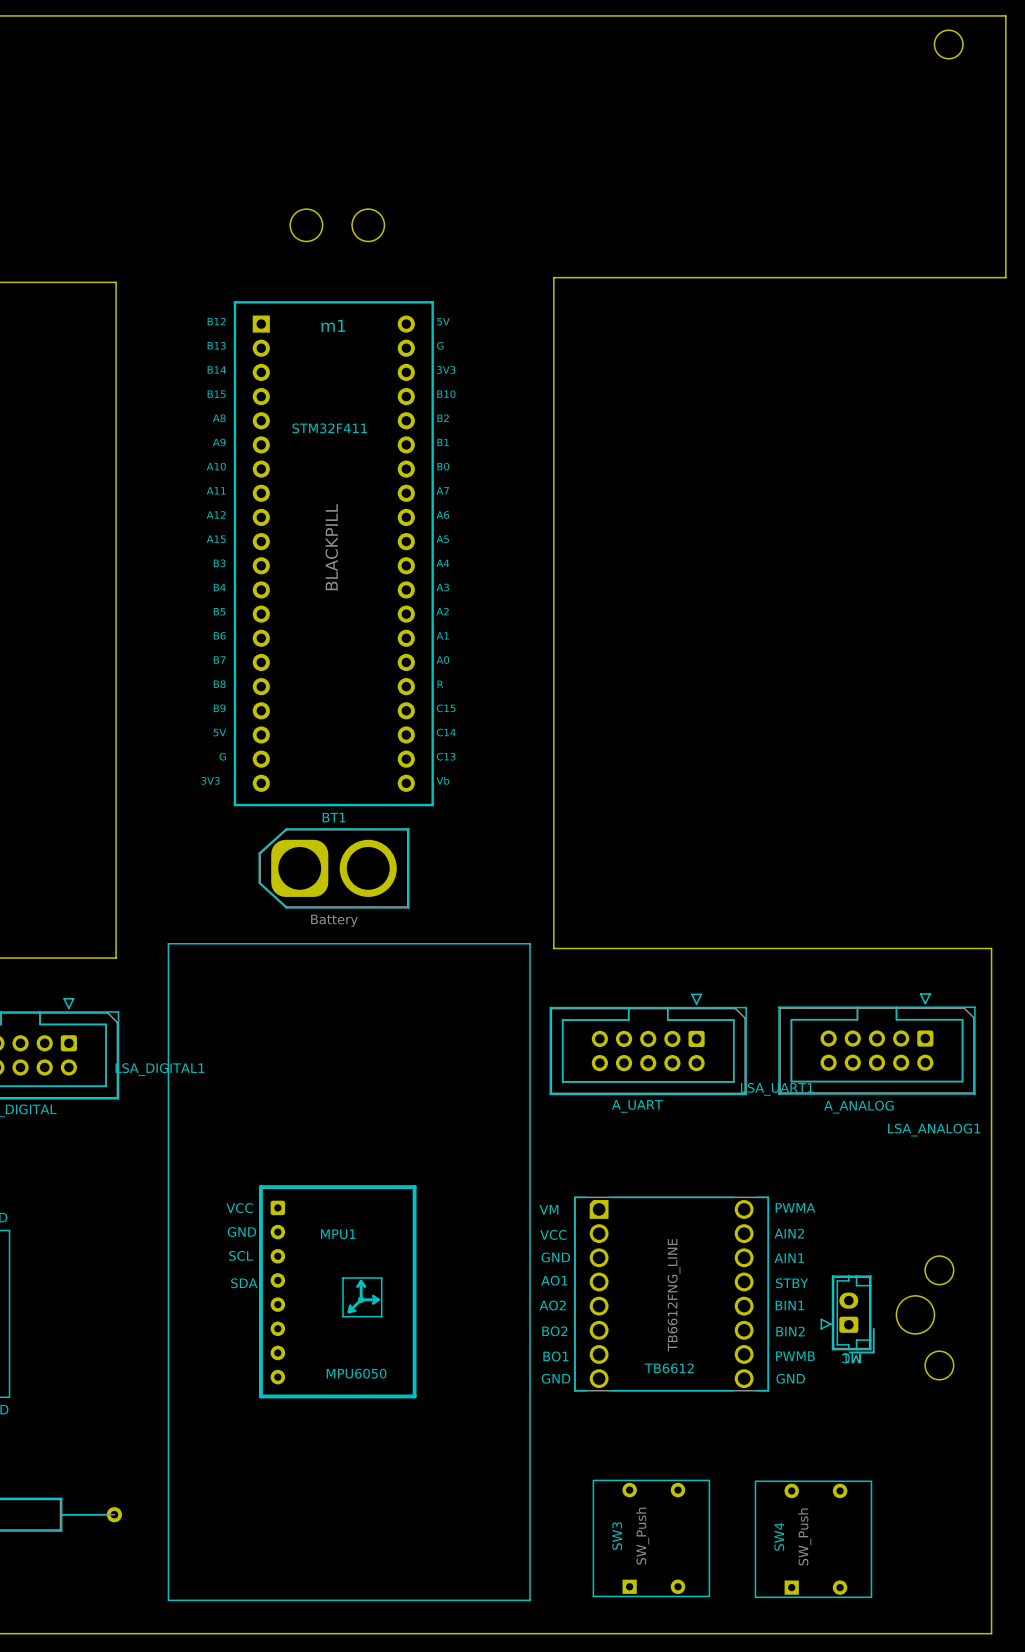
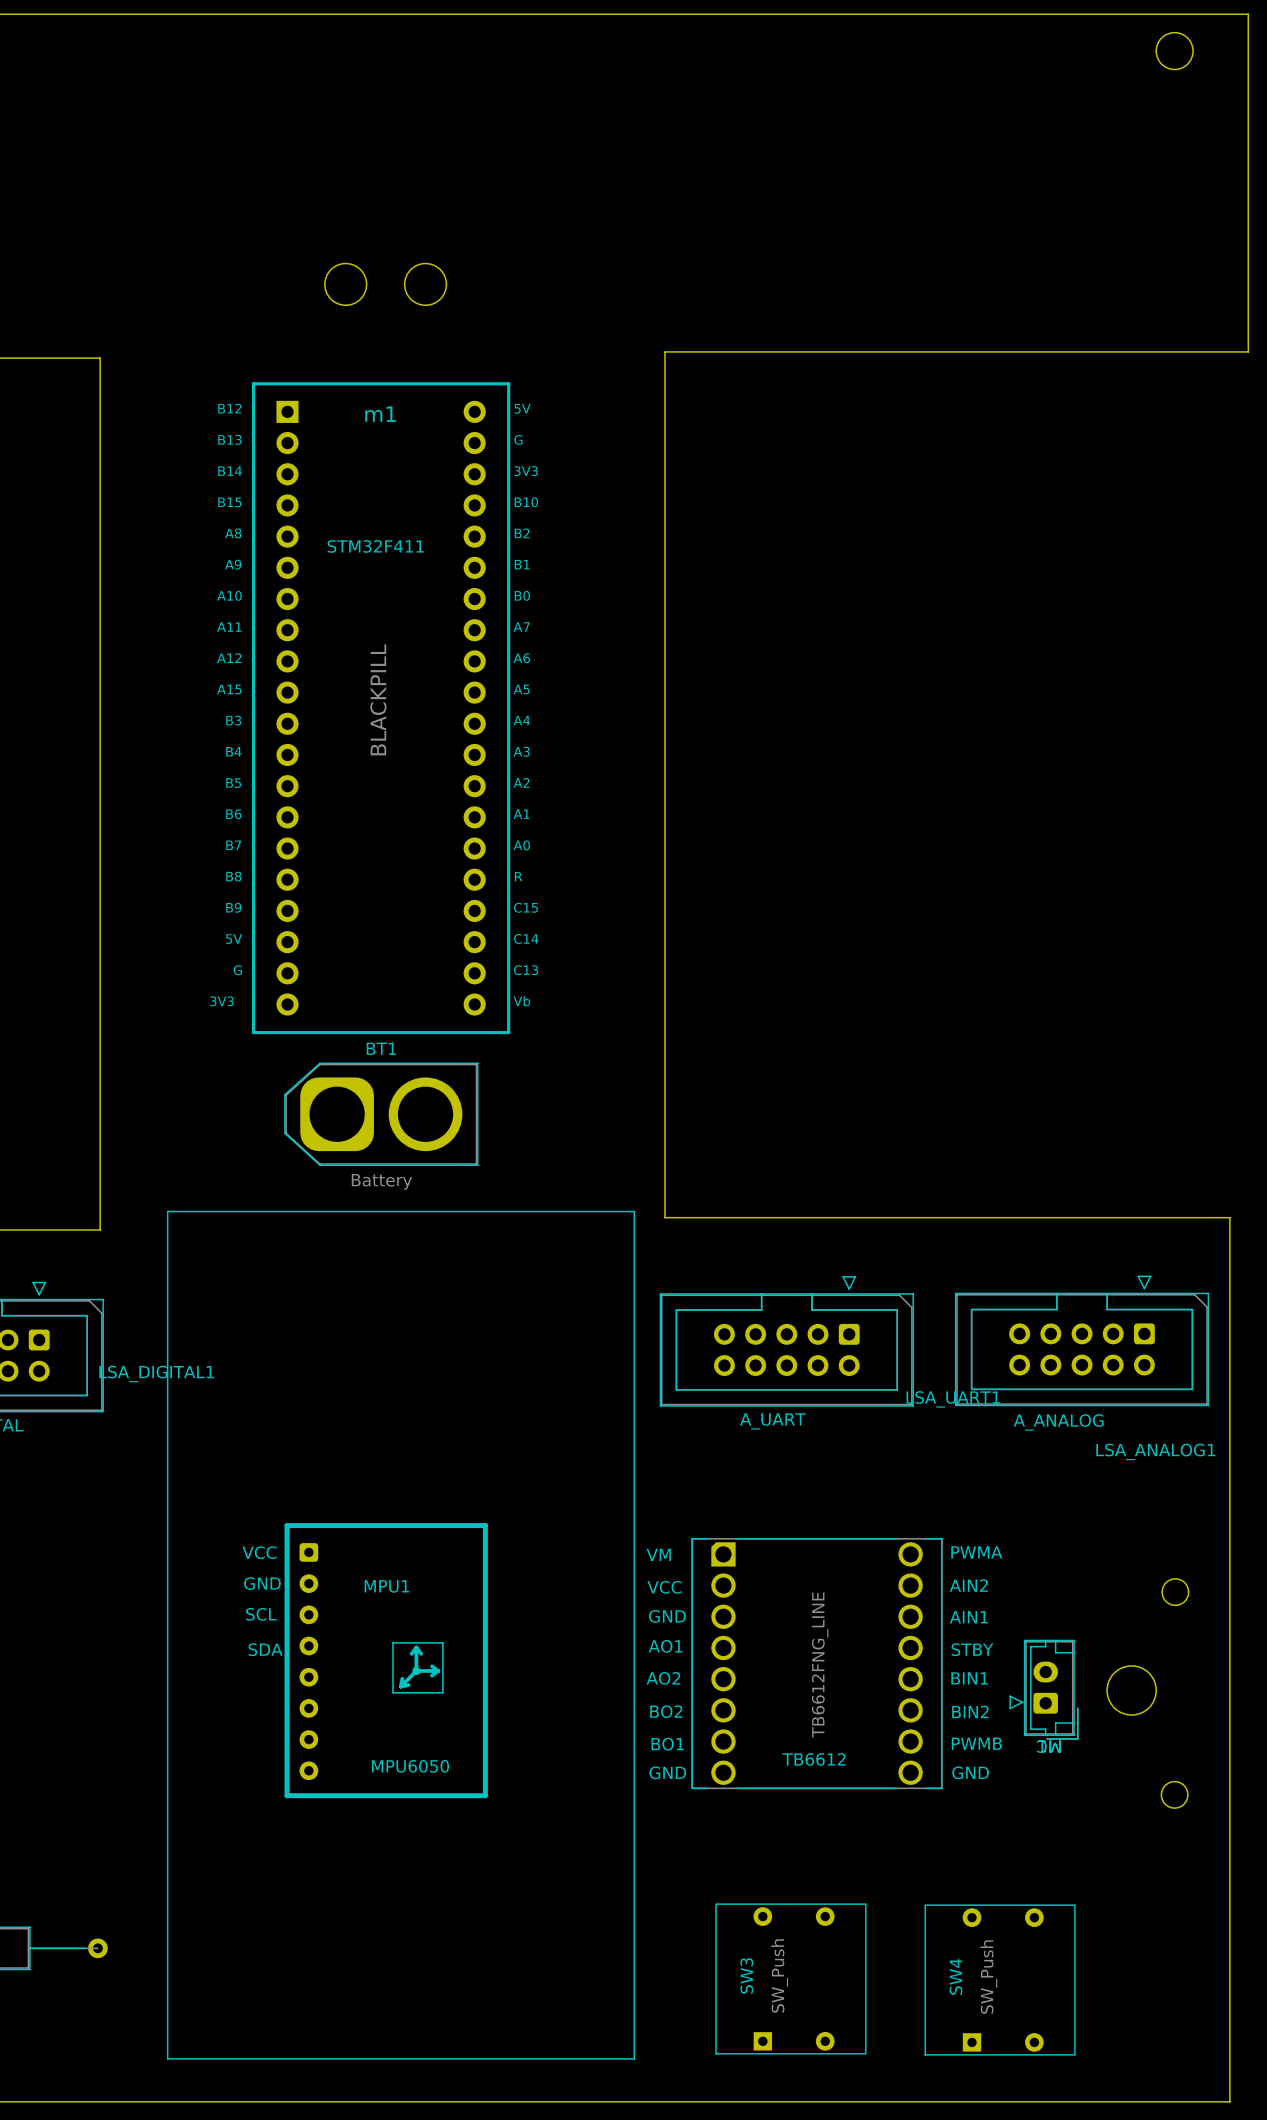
round board edge: none -> [1161, 1578, 1189, 1606]
round board edge: [924, 1255, 955, 1286] -> none
round board edge: [924, 1350, 955, 1381] -> none
round board edge: none -> [1161, 1781, 1189, 1809]

